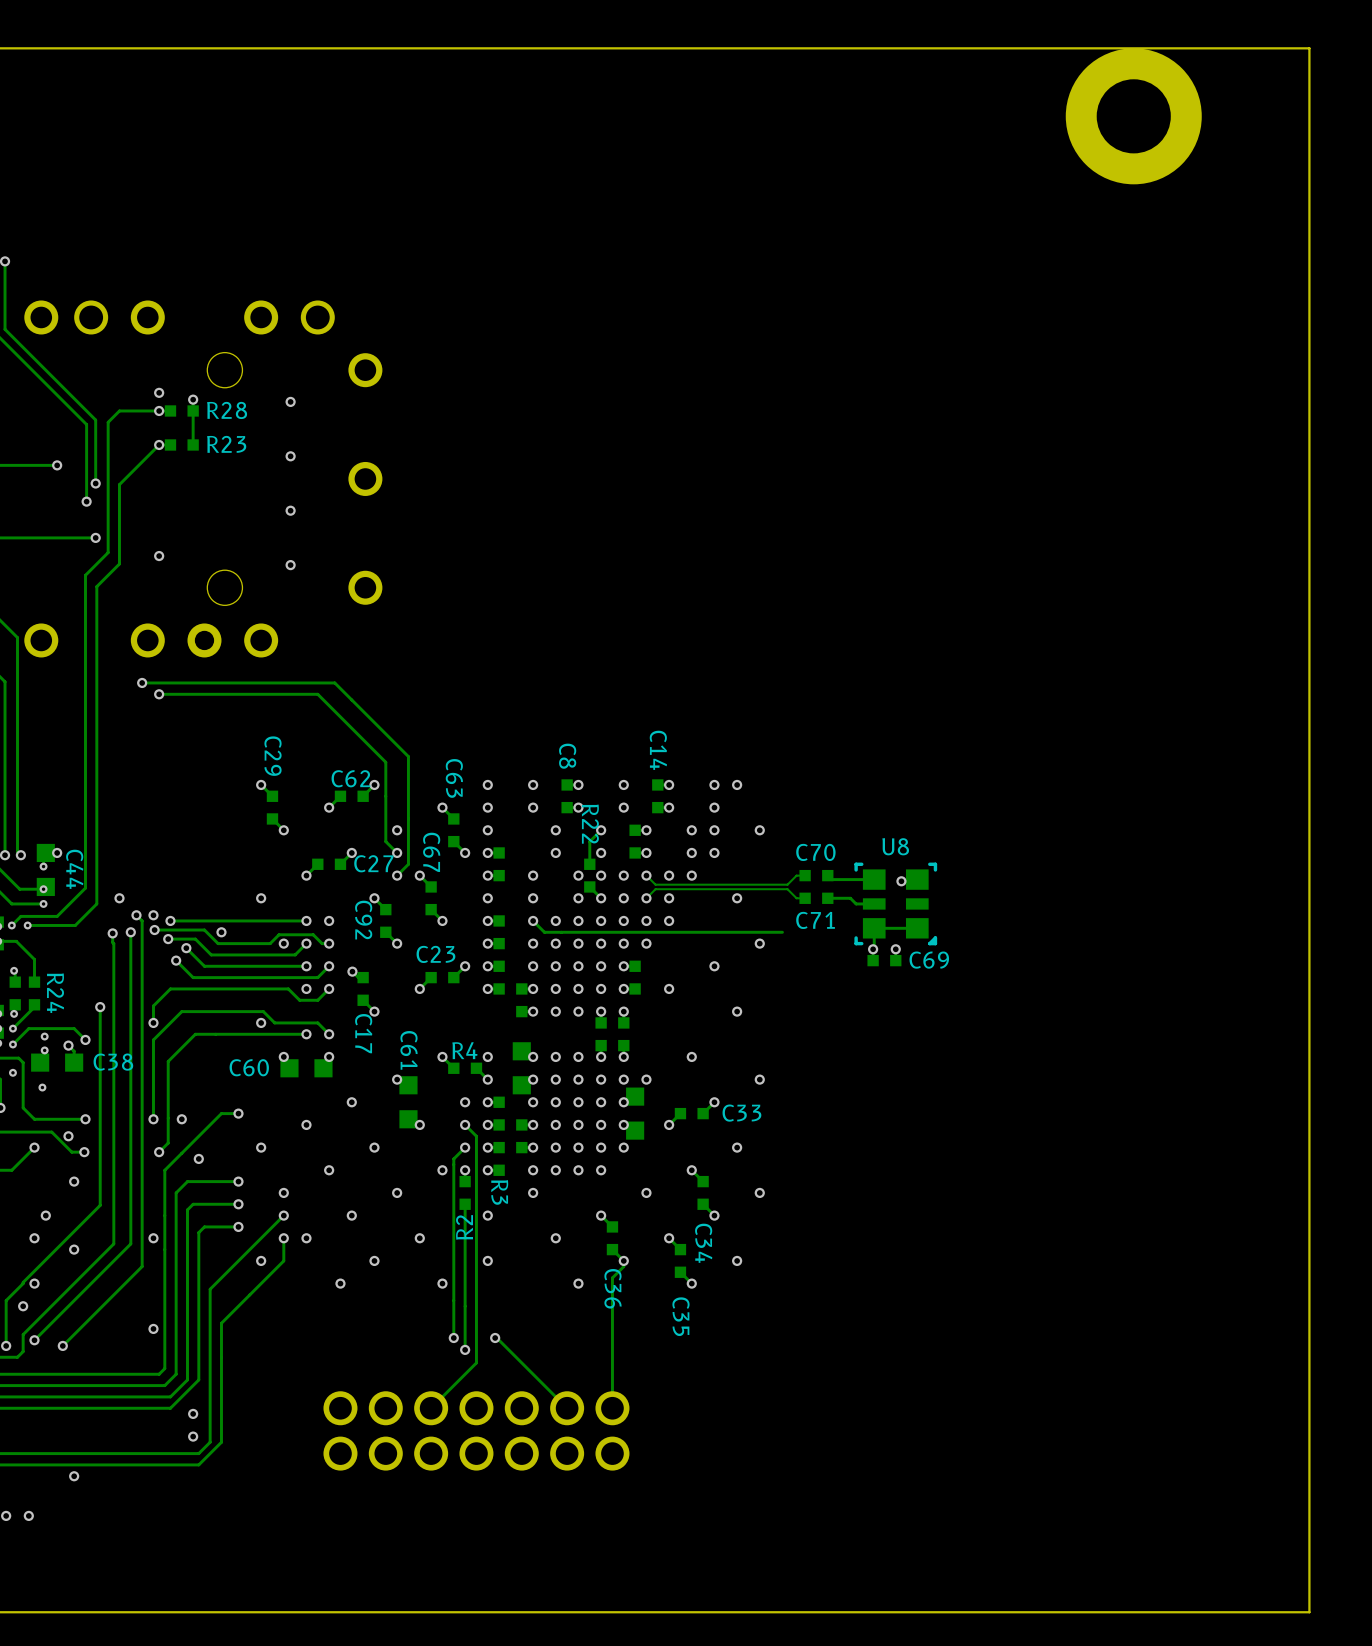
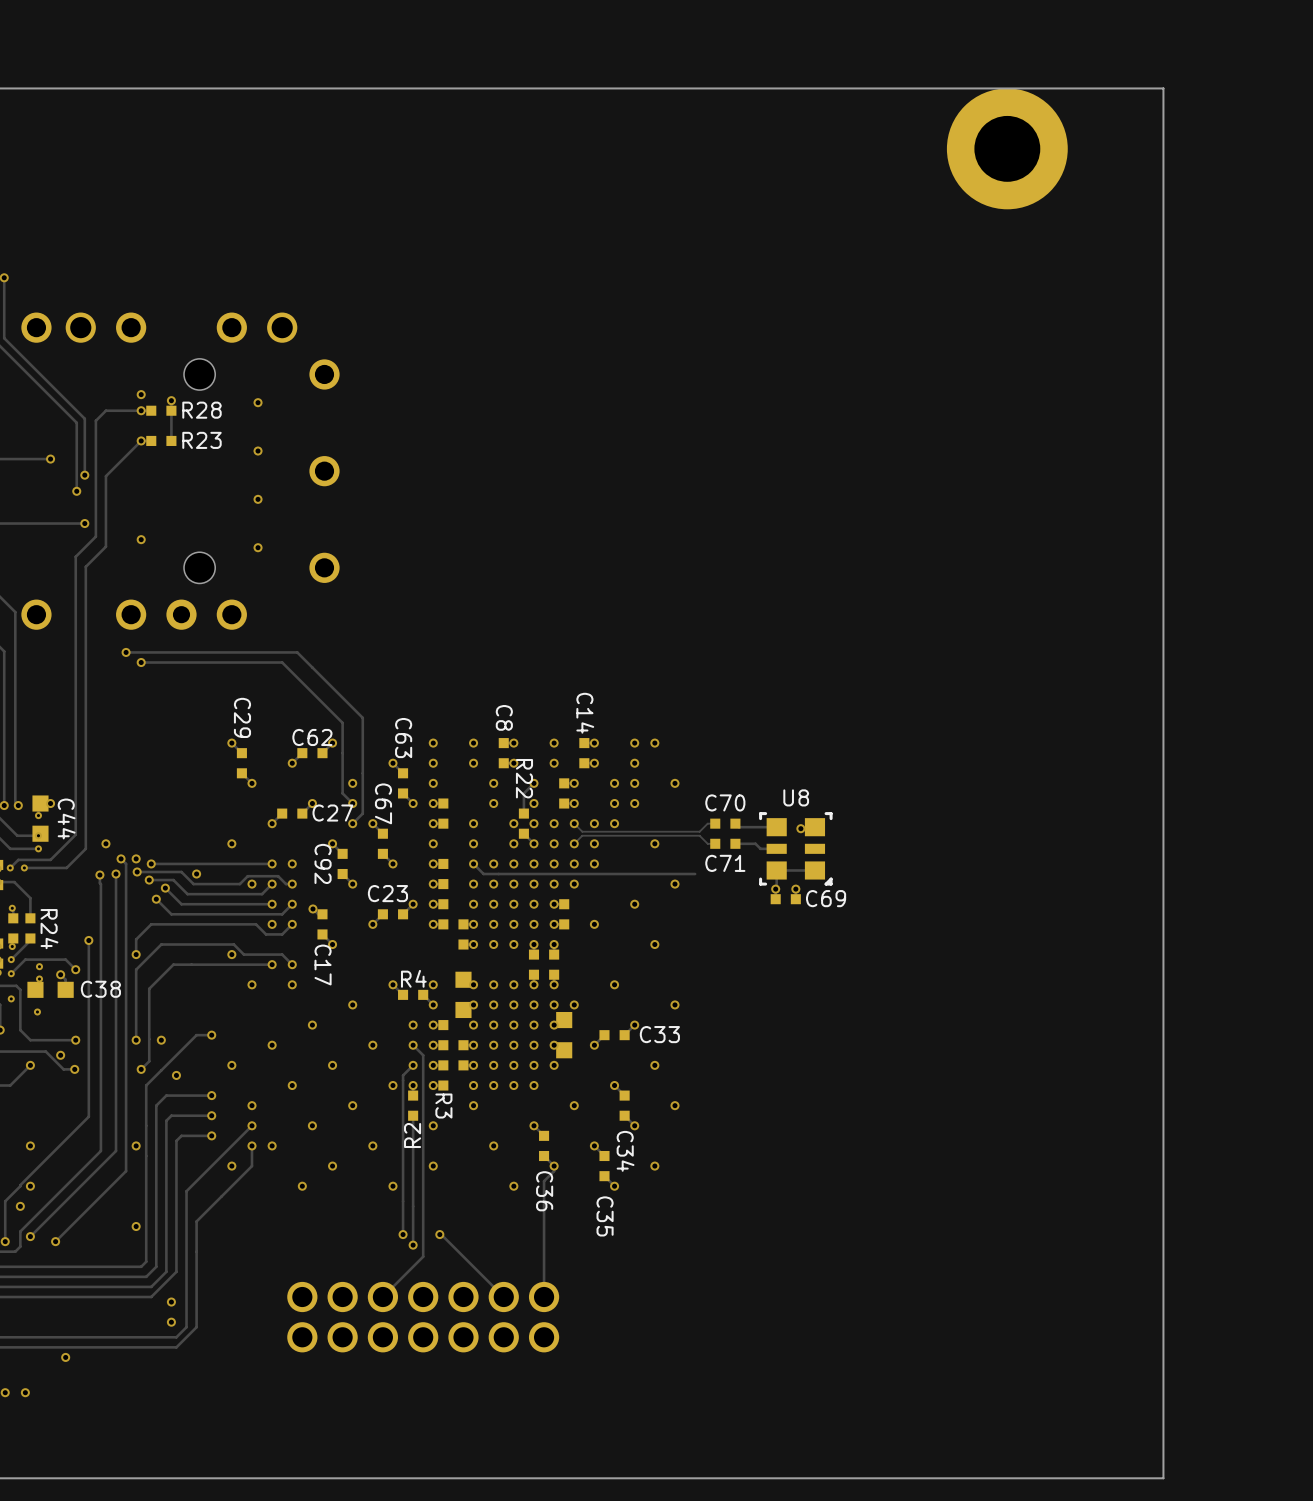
C60: (306, 1068) -> none
C61: (408, 1102) -> none
via: (74, 1181) -> none
via: (45, 1215) -> none
via: (74, 1249) -> none

